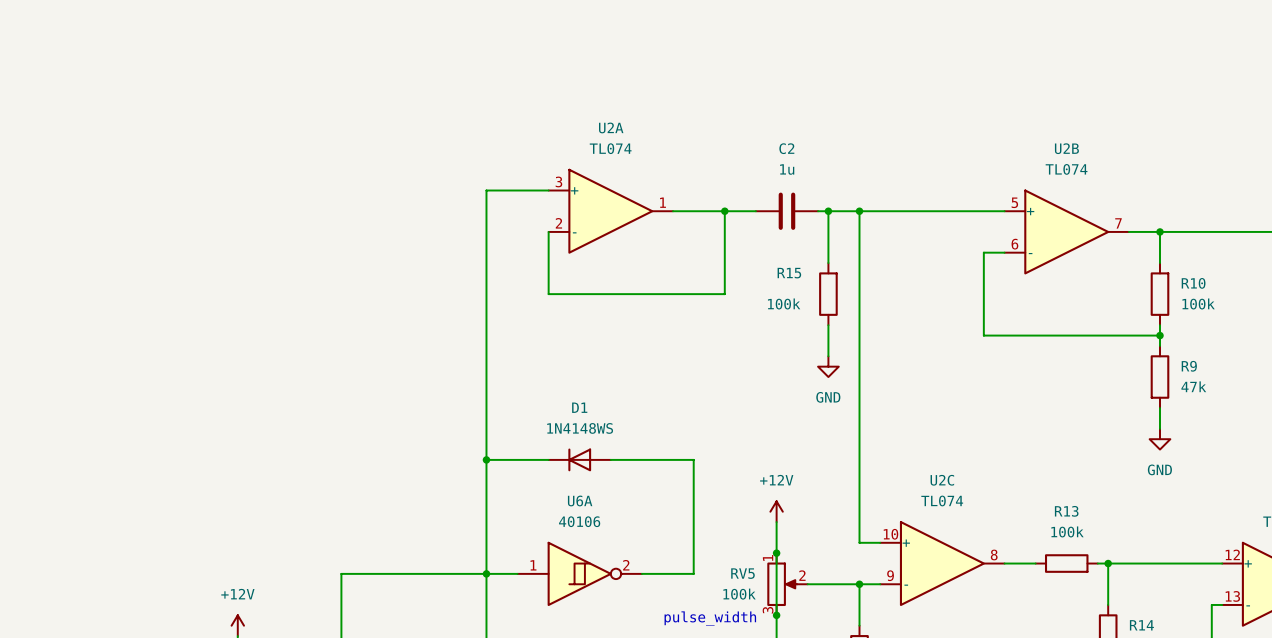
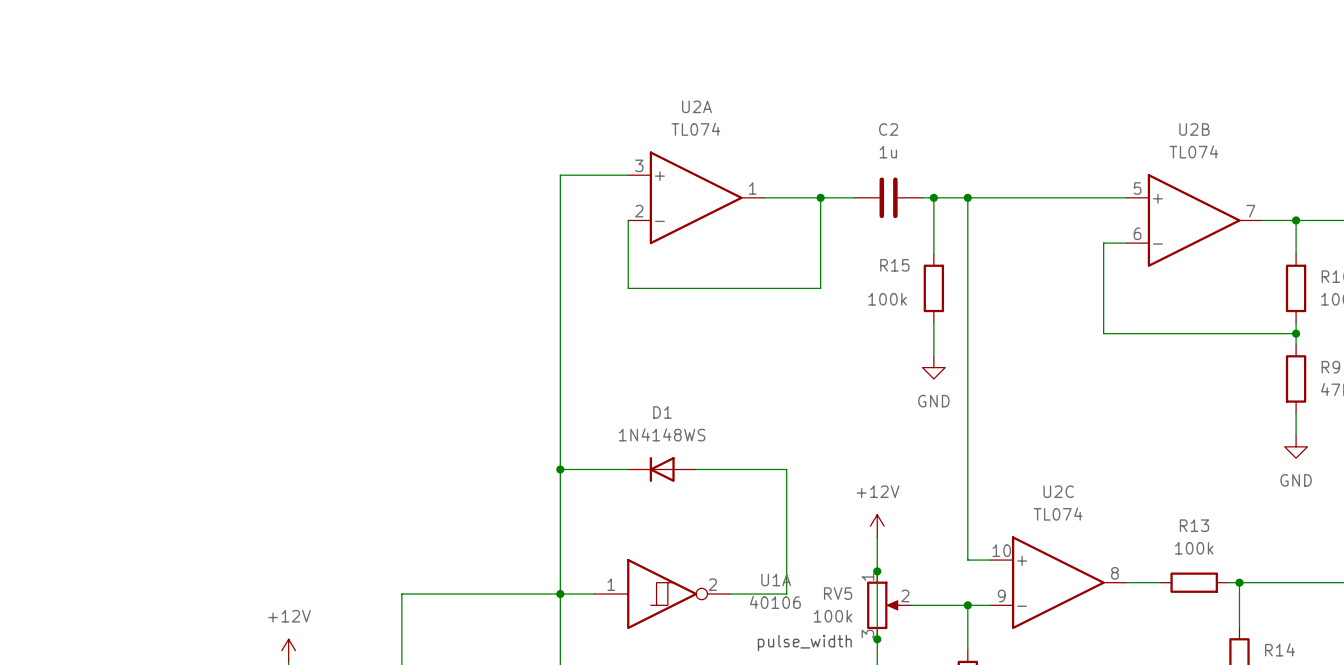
U6A name: U6A (580, 500) -> U1A (776, 580)
U6A value position: 40106 (579, 521) -> 40106 (775, 602)

